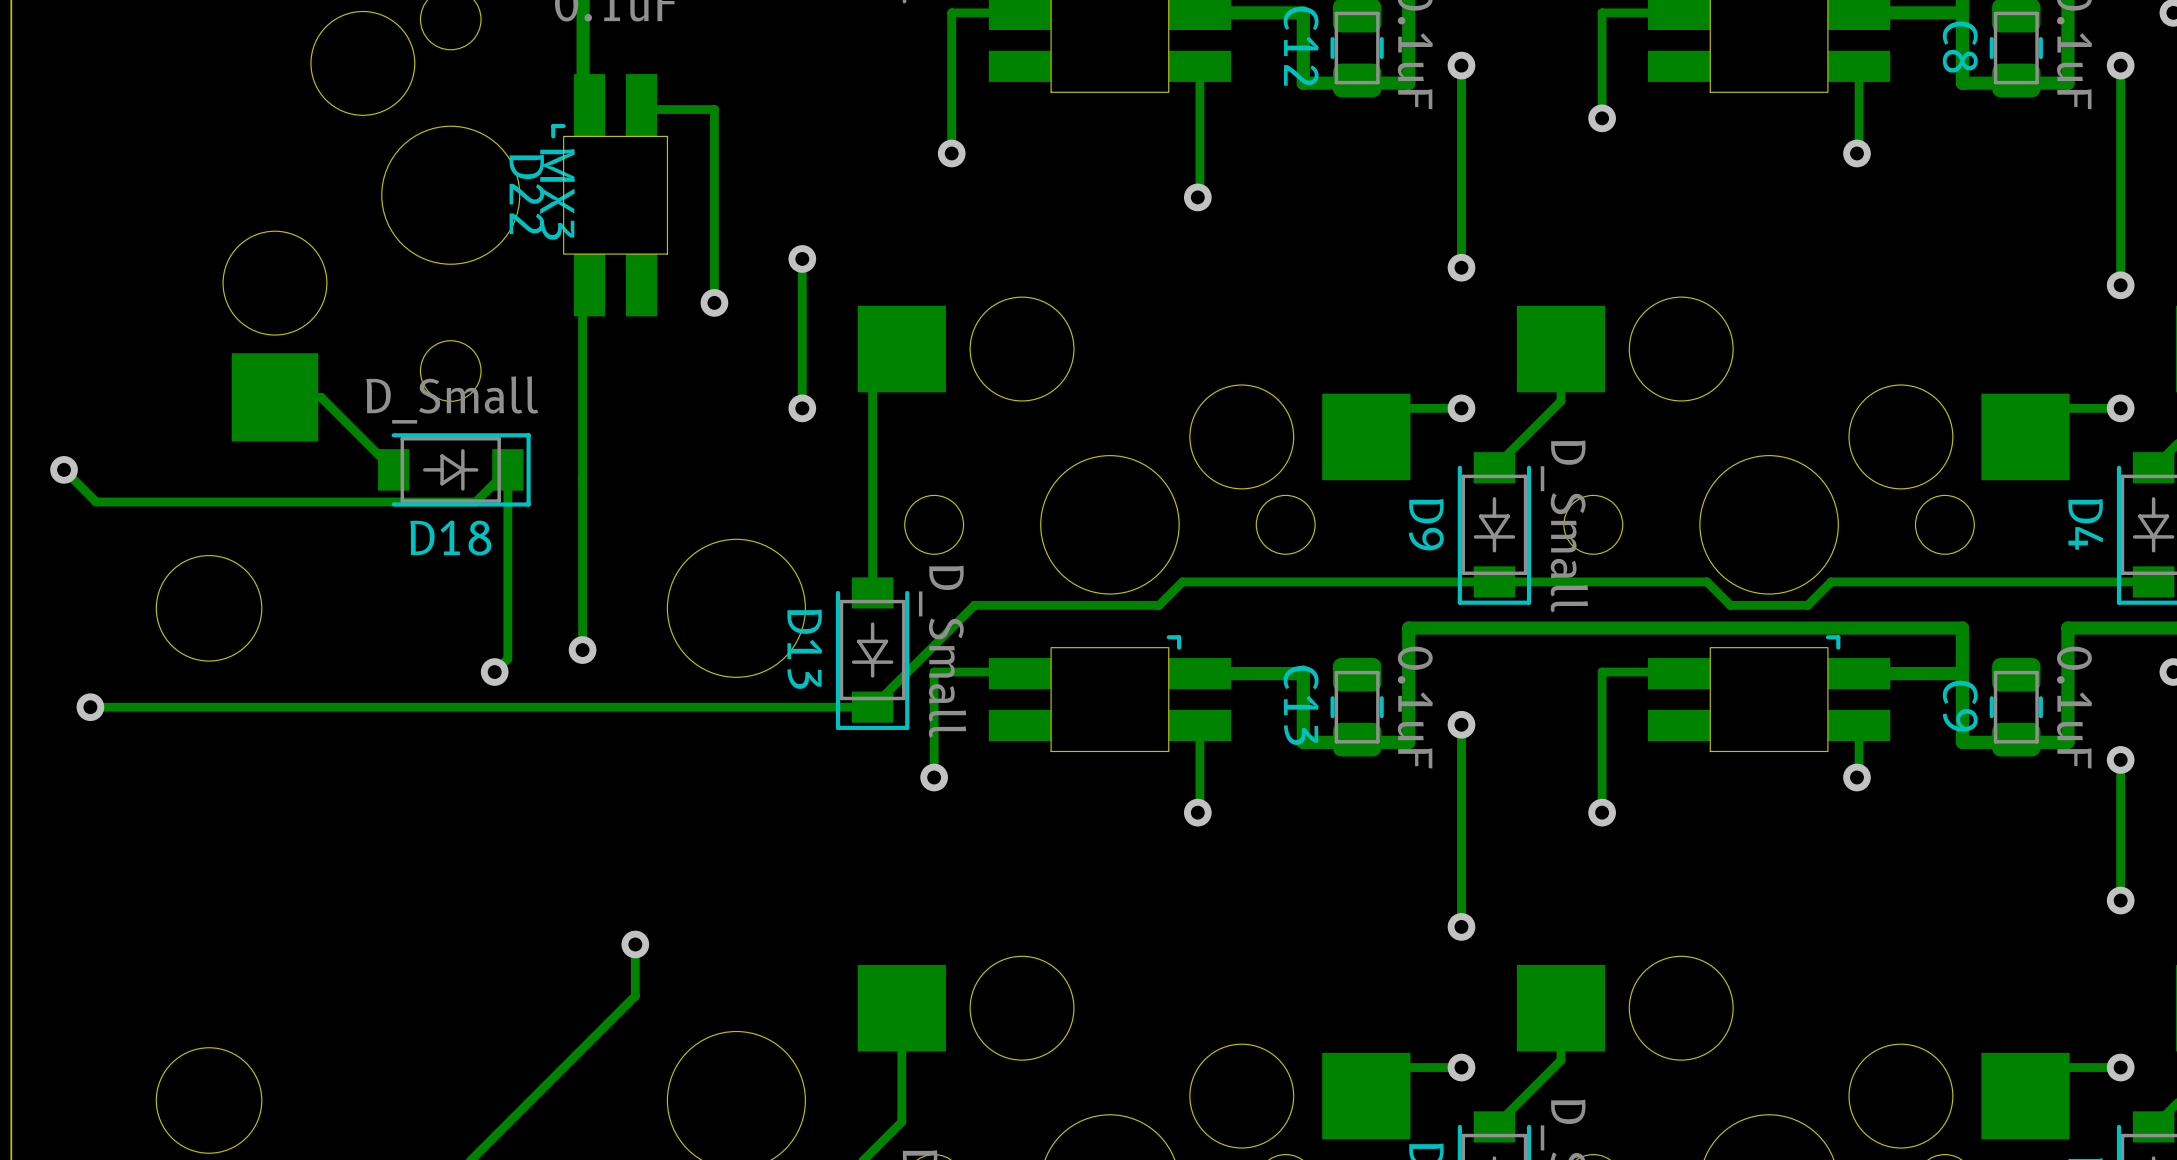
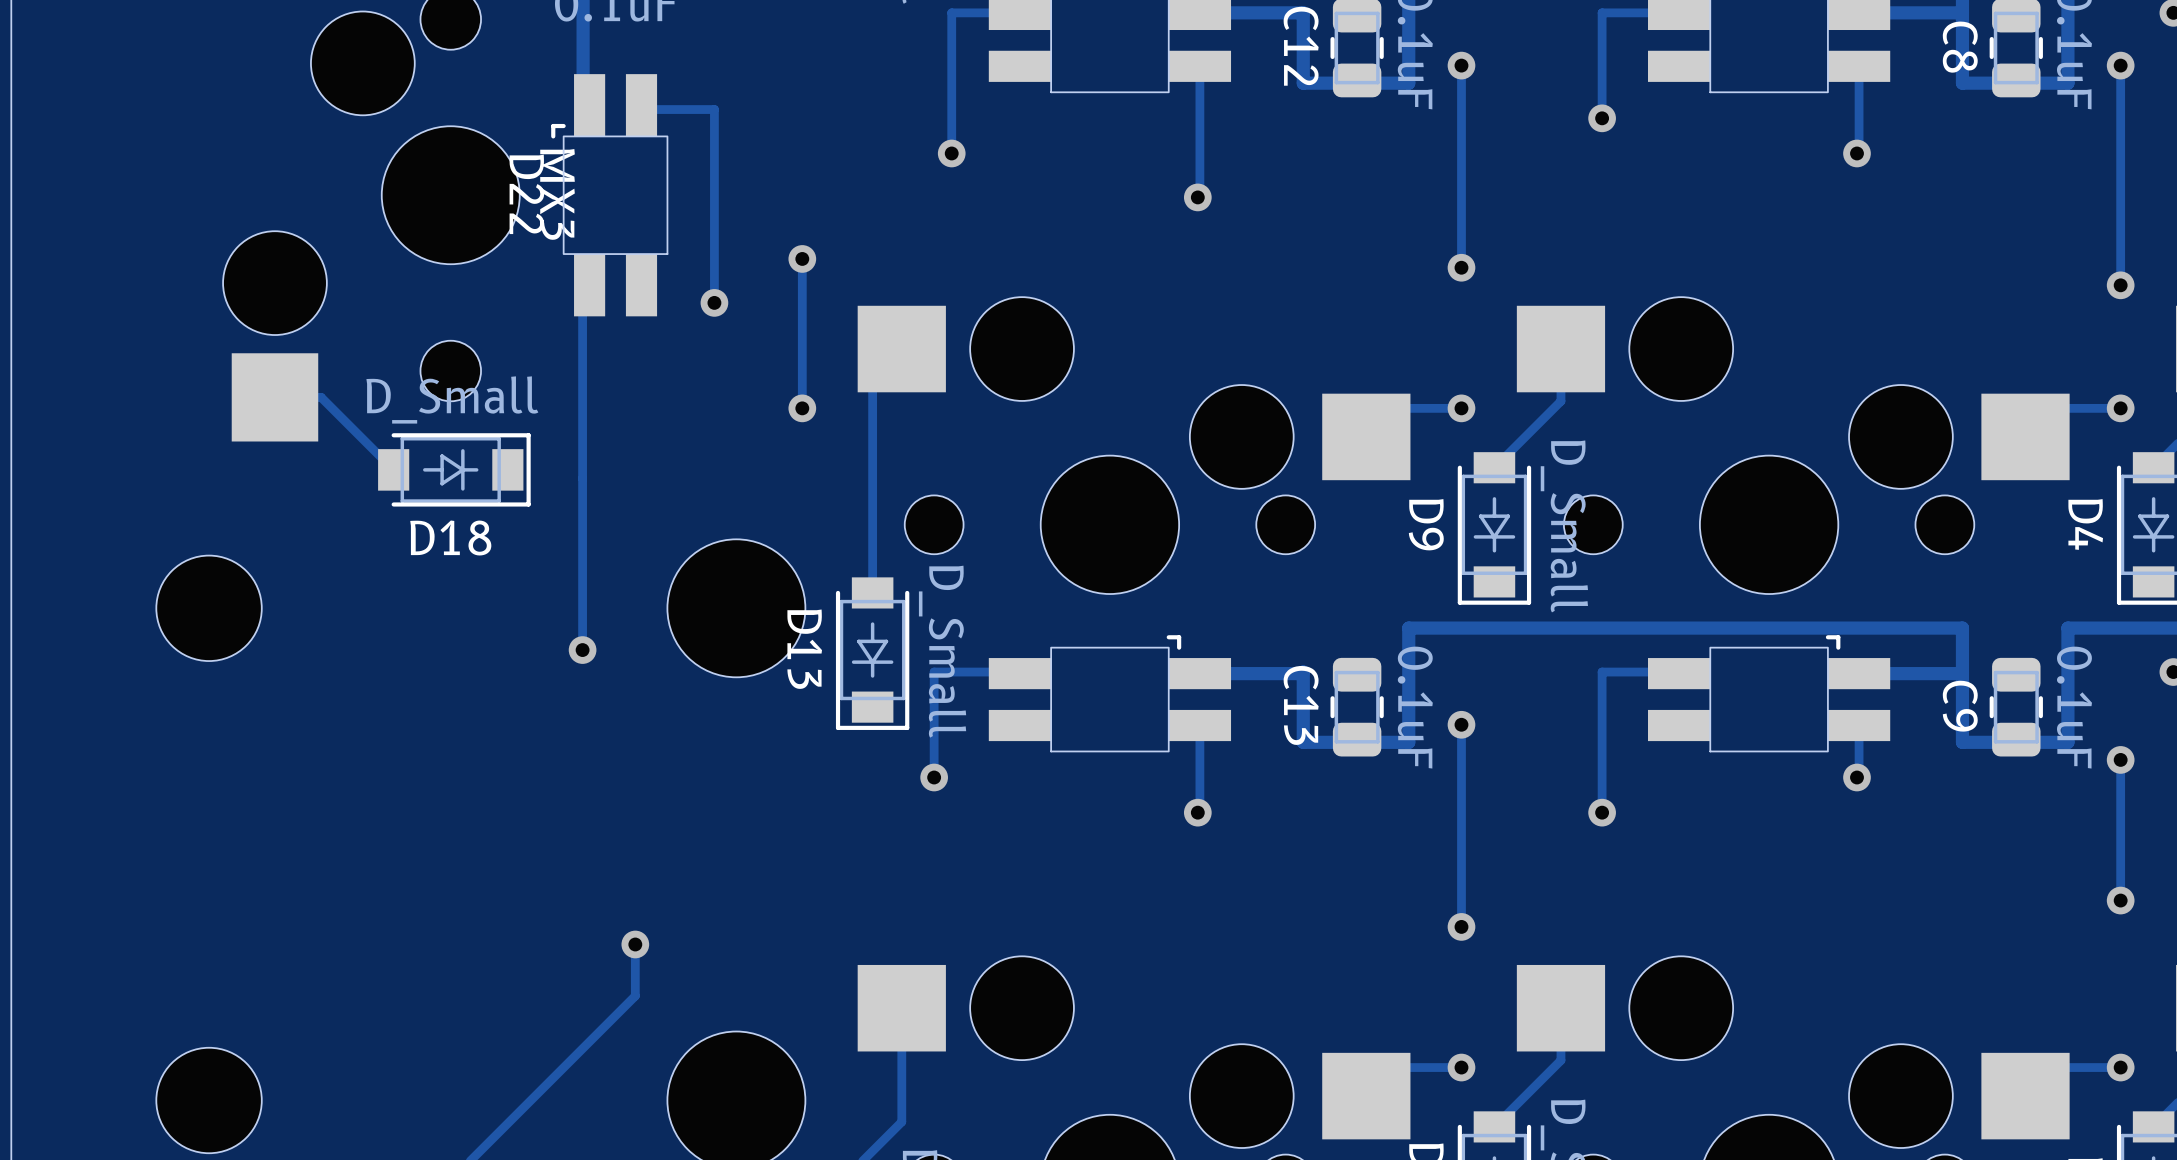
track: (64, 469) (96, 501) (475, 501) (507, 469) (507, 658) (494, 672) -> none
via: (64, 469) -> none
track: (2153, 581) (1831, 581) (1807, 605) (1730, 605) (1707, 581) (1182, 581) (1159, 605) (974, 605) (872, 707) (90, 707) -> none
via: (494, 672) -> none
via: (90, 707) -> none

